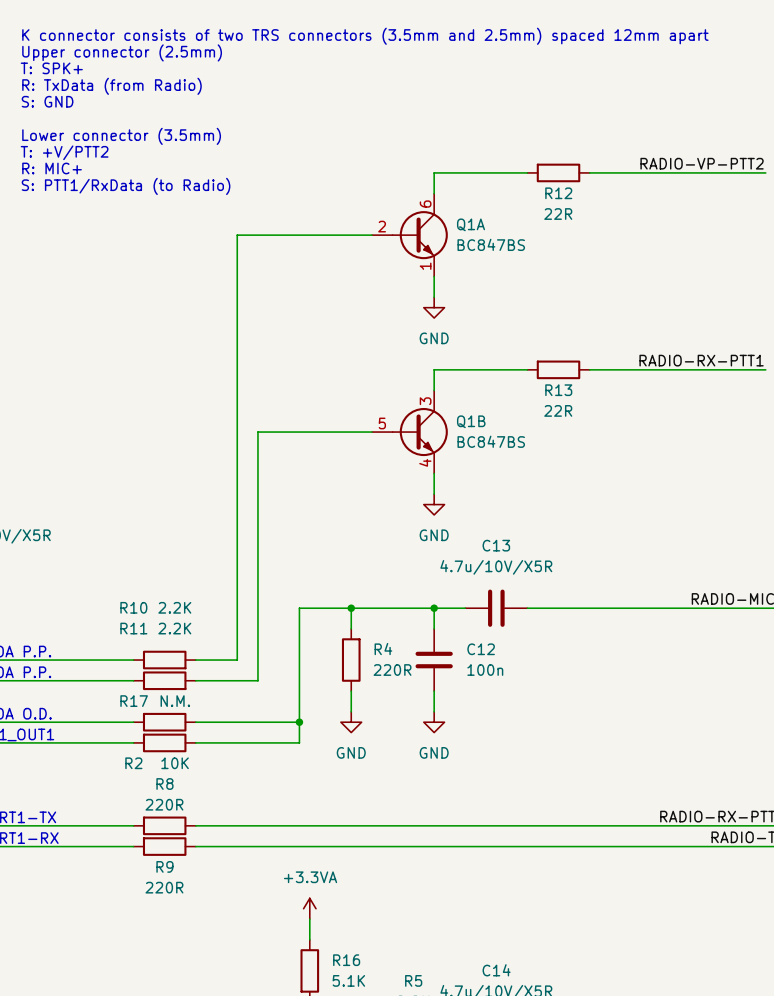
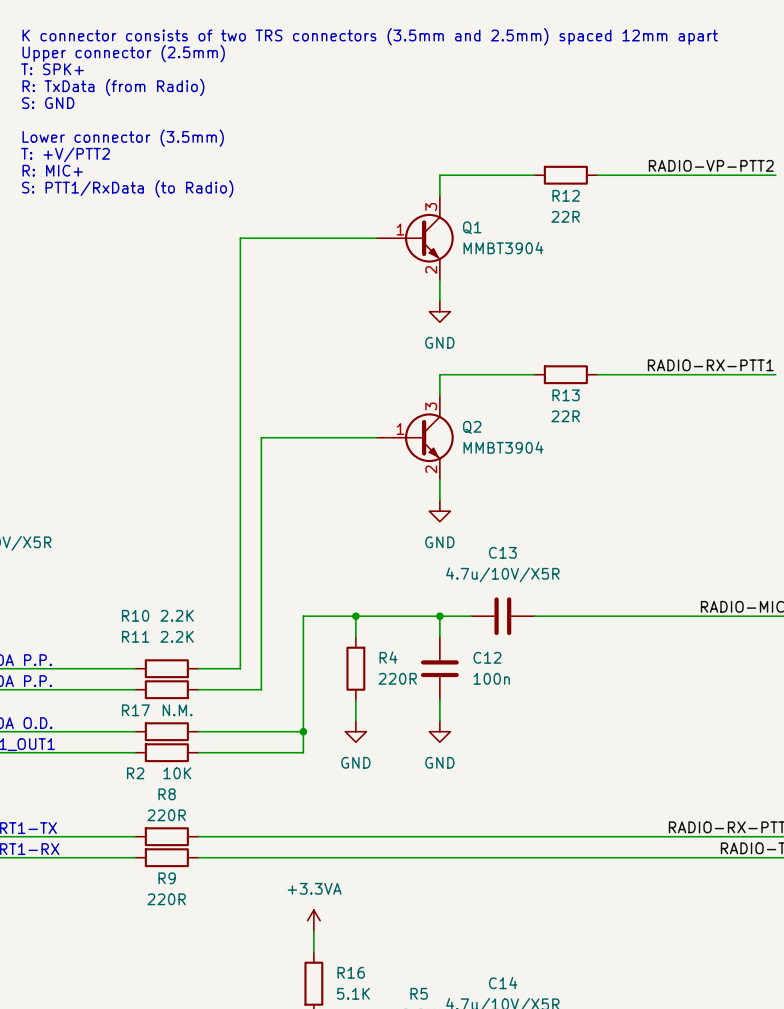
Q1A: BC847BS (409, 235) -> none
Q1: none -> MMBT3904 (415, 238)
Q1B: BC847BS (409, 432) -> none
Q2: none -> MMBT3904 (415, 437)

